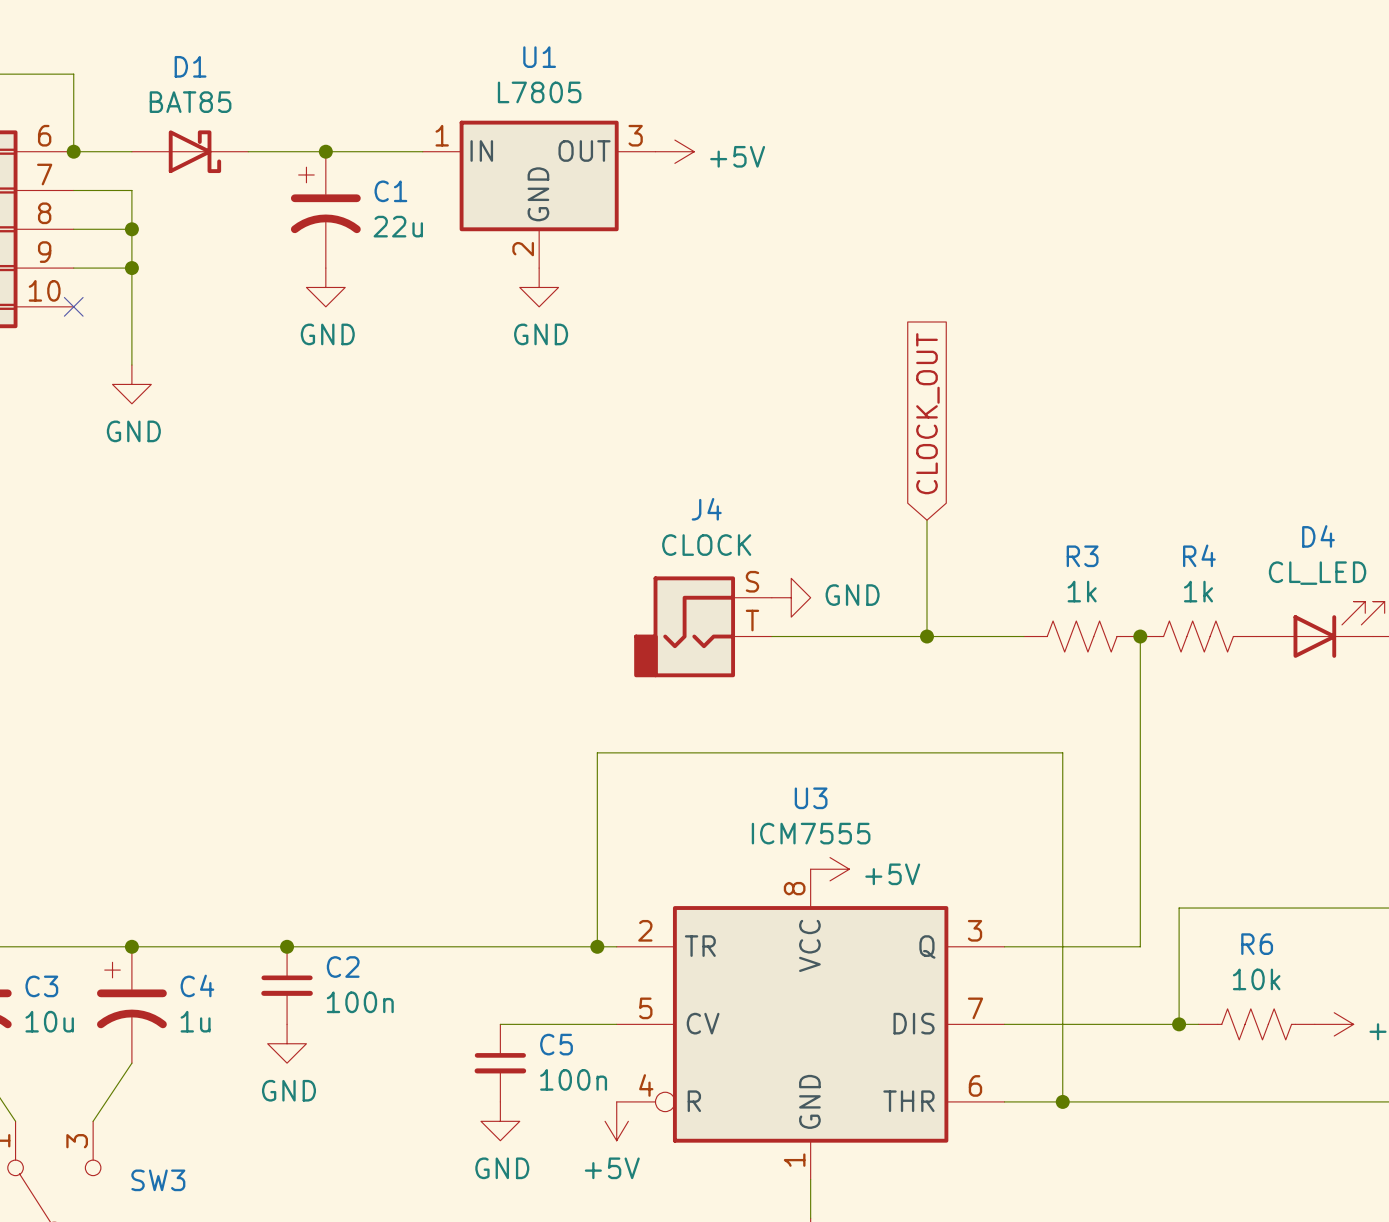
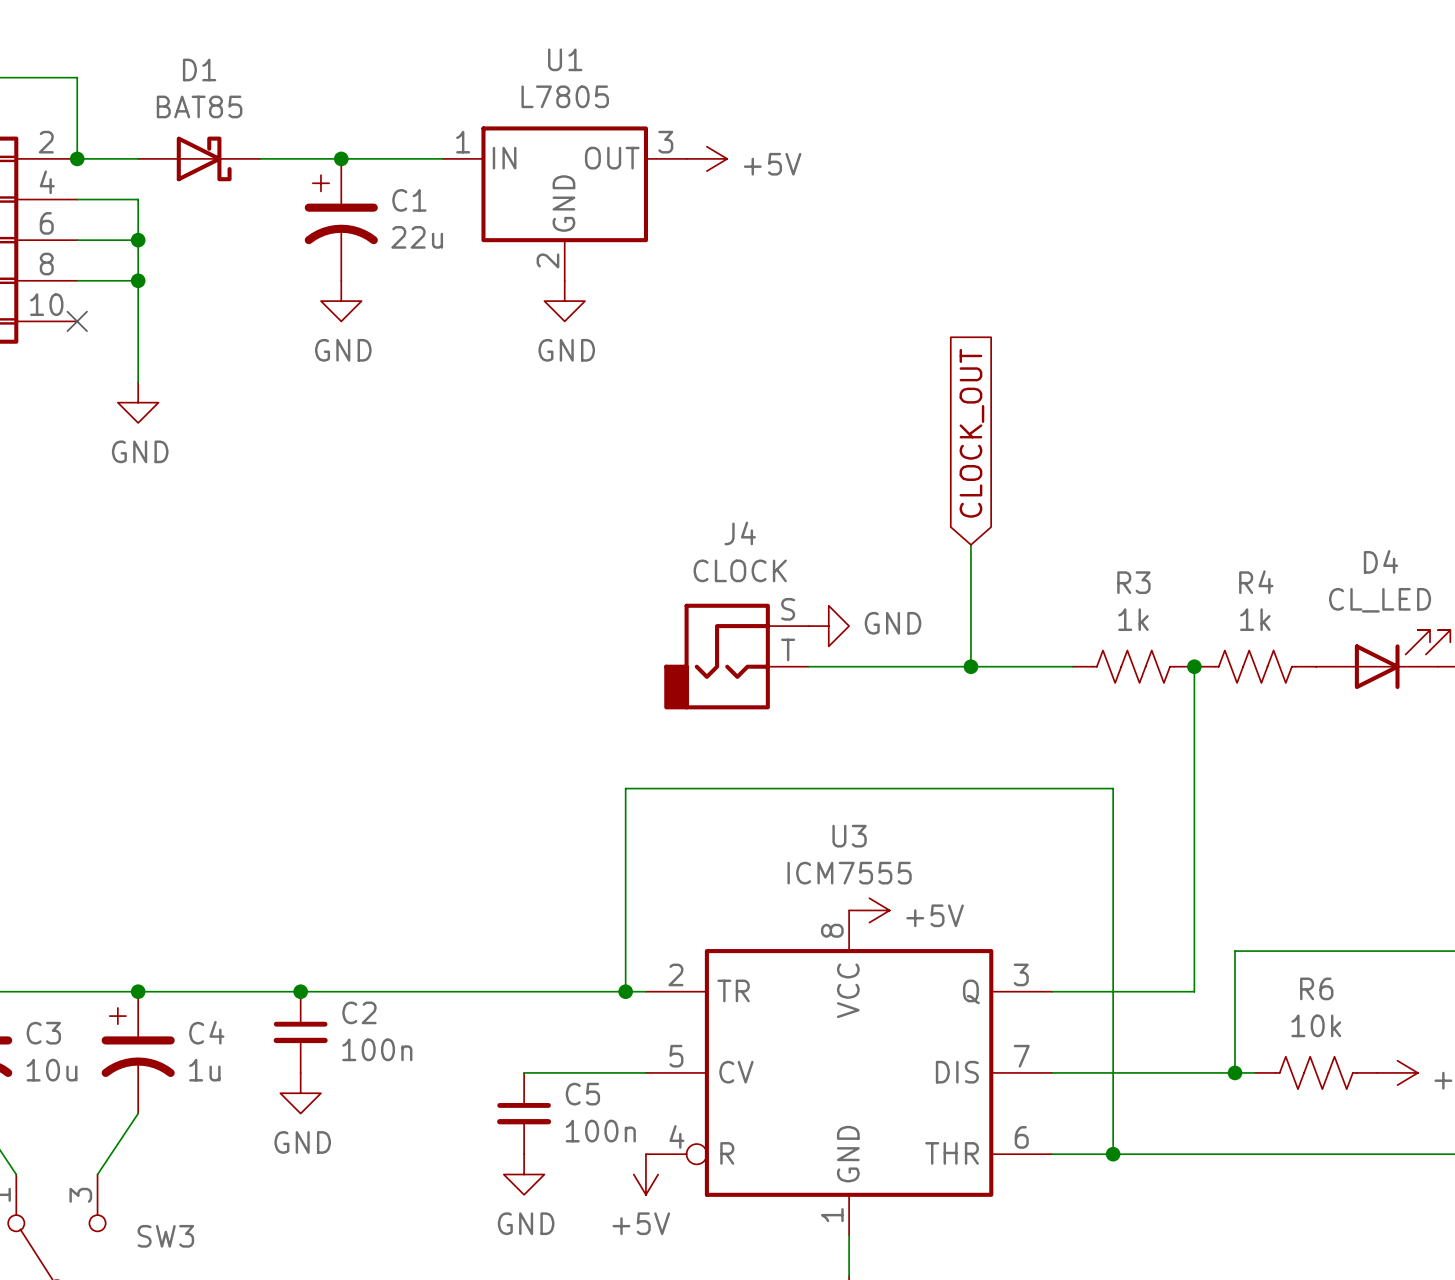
part pin number: 6 (44, 135) -> 2 (46, 142)
part pin number: 7 (44, 174) -> 4 (47, 182)
part pin number: 8 (44, 213) -> 6 (46, 223)
part pin number: 9 (44, 252) -> 8 (46, 264)

